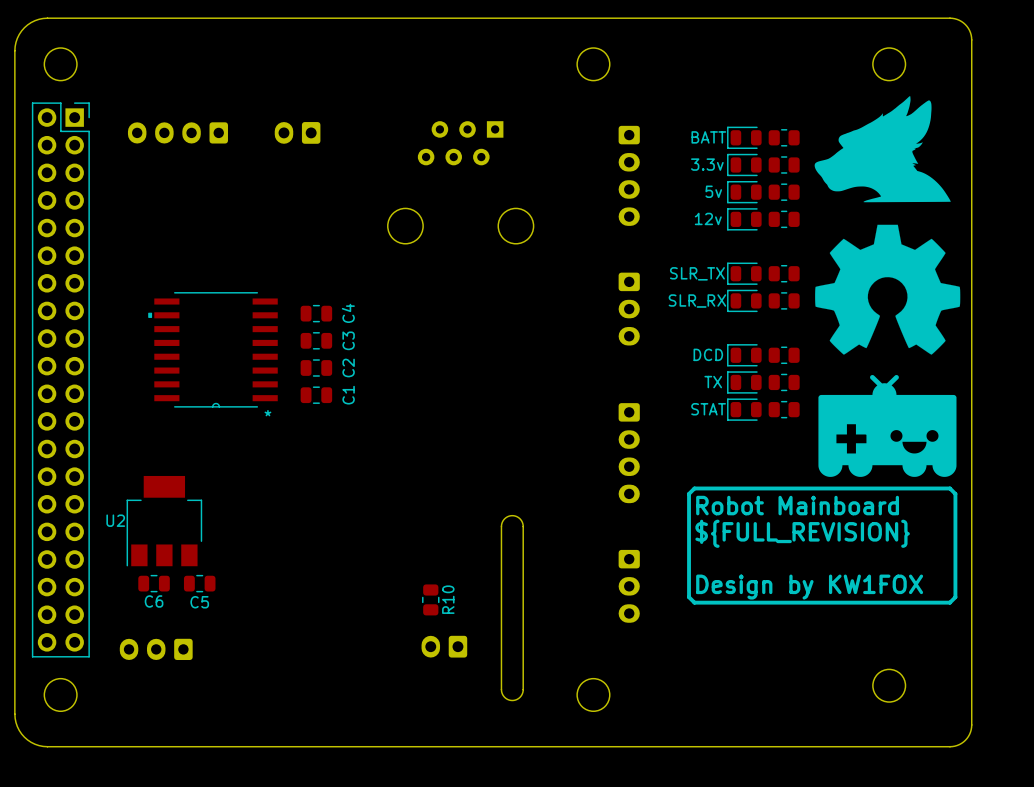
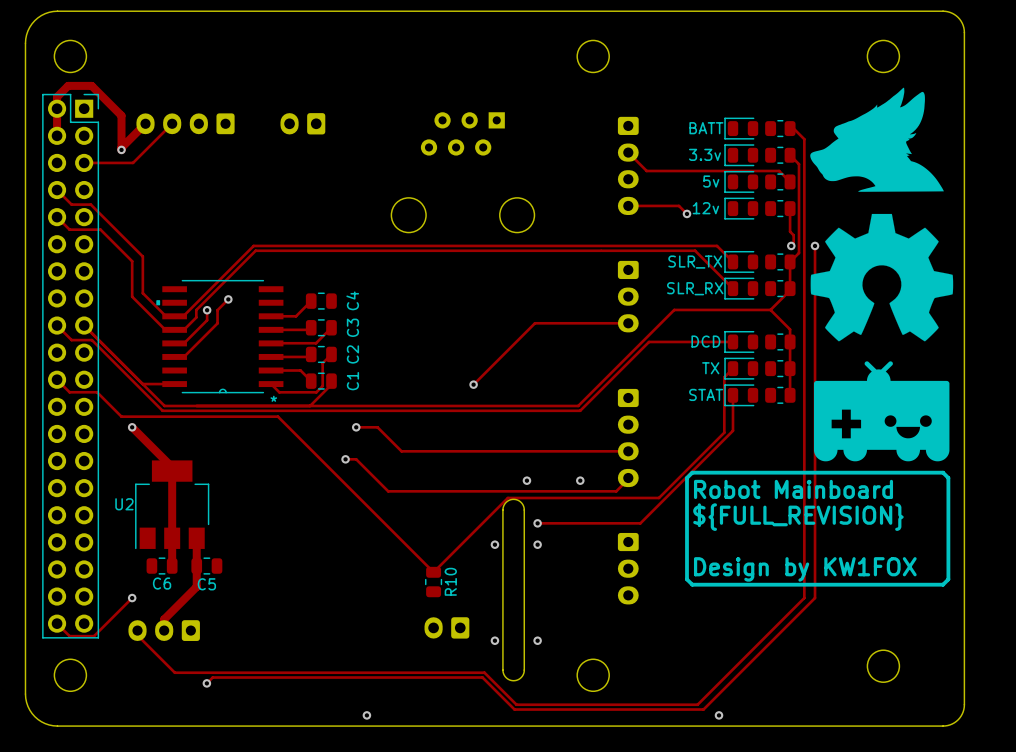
track: none -> (145, 123) (121, 147)
track: none -> (172, 123) (133, 162) (84, 162)
track: none -> (790, 128) (793, 128) (804, 139) (804, 598) (697, 704) (516, 704) (484, 672) (174, 672) (137, 635) (137, 630)
track: none -> (57, 135) (57, 97) (68, 85) (91, 85) (121, 115) (121, 149)
via: none -> (121, 149)
track: none -> (625, 152) (628, 152) (646, 170) (779, 170) (790, 181)
track: none -> (790, 155) (799, 164) (799, 253) (790, 261) (790, 290) (770, 309)
track: none -> (57, 190) (71, 204) (90, 204) (142, 256) (142, 293) (165, 316) (183, 316) (253, 245) (716, 245) (733, 261)
track: none -> (628, 205) (678, 205) (686, 213)
track: none -> (790, 208) (790, 231) (793, 235) (793, 243) (791, 245)
via: none -> (686, 213)
track: none -> (57, 217) (69, 229) (100, 229) (132, 261) (132, 296) (165, 329) (183, 329) (196, 317) (196, 310) (255, 250) (600, 250)
via: none -> (791, 245)
track: none -> (815, 245) (815, 598) (703, 709) (514, 709) (482, 677) (212, 677) (206, 683)
via: none -> (815, 245)
track: none -> (601, 250) (695, 250) (733, 288)
track: none -> (228, 299) (217, 310) (217, 323) (183, 356) (174, 356)
via: none -> (228, 299)
track: none -> (311, 301) (296, 316) (271, 316)
track: none -> (207, 310) (207, 320) (183, 343) (174, 343)
via: none -> (207, 310)
track: none -> (770, 309) (790, 329) (790, 395)
track: none -> (770, 309) (674, 309) (578, 405) (164, 405) (84, 325)
track: none -> (628, 323) (534, 323) (473, 384)
track: none -> (57, 325) (71, 340) (91, 340) (162, 410) (580, 410) (649, 341) (733, 341)
track: none -> (311, 327) (309, 329) (271, 329)
track: none -> (331, 327) (316, 343) (271, 343)
track: none -> (311, 354) (308, 356) (271, 356)
track: none -> (331, 354) (322, 363) (322, 386) (316, 392) (279, 392) (271, 384)
track: none -> (733, 368) (724, 377) (724, 432) (659, 497) (507, 497) (433, 572) (277, 416) (121, 416) (97, 392) (69, 392) (57, 379)
track: none -> (271, 370) (300, 370) (311, 381)
track: none -> (331, 381) (331, 384) (310, 405)
track: none -> (142, 384) (174, 384)
via: none -> (473, 384)
track: none -> (733, 395) (733, 430) (640, 523) (537, 523)
track: none -> (132, 427) (172, 467) (172, 566)
via: none -> (132, 427)
track: none -> (356, 427) (377, 427) (401, 451) (628, 451)
via: none -> (356, 427)
track: none -> (345, 459) (356, 459) (388, 491) (616, 491) (628, 478)
via: none -> (345, 459)
via: none -> (526, 480)
via: none -> (580, 480)
via: none -> (537, 523)
track: none -> (196, 538) (196, 586) (164, 619) (164, 630)
via: none -> (494, 544)
via: none -> (537, 544)
track: none -> (132, 598) (94, 636) (69, 636) (57, 623)
via: none -> (132, 598)
via: none -> (494, 640)
via: none -> (537, 640)
via: none -> (206, 683)
via: none -> (366, 715)
via: none -> (718, 715)

